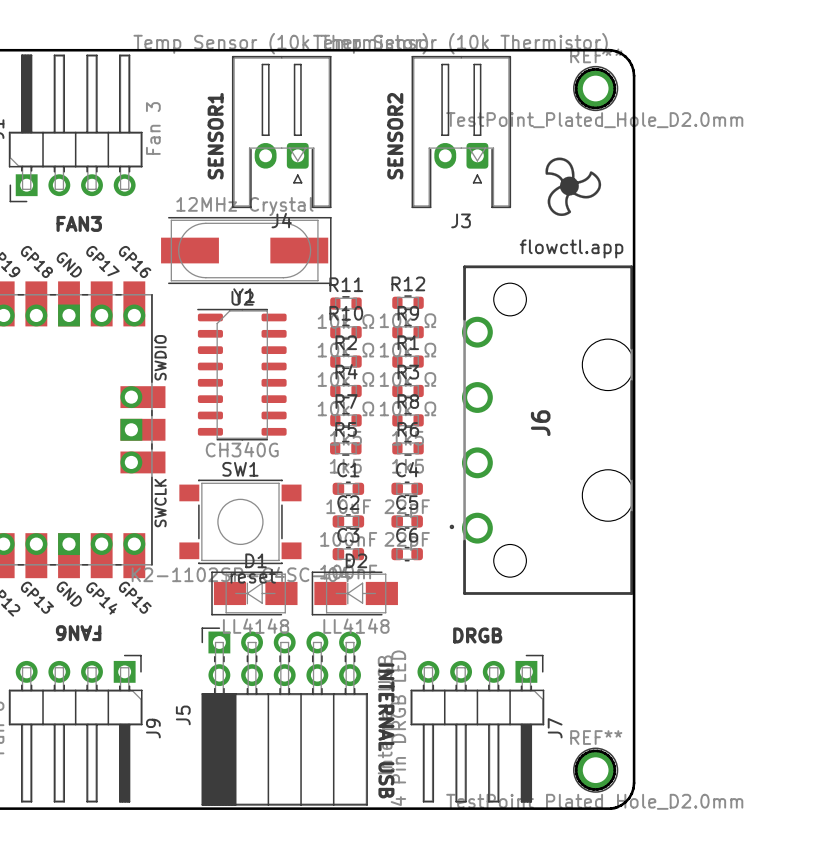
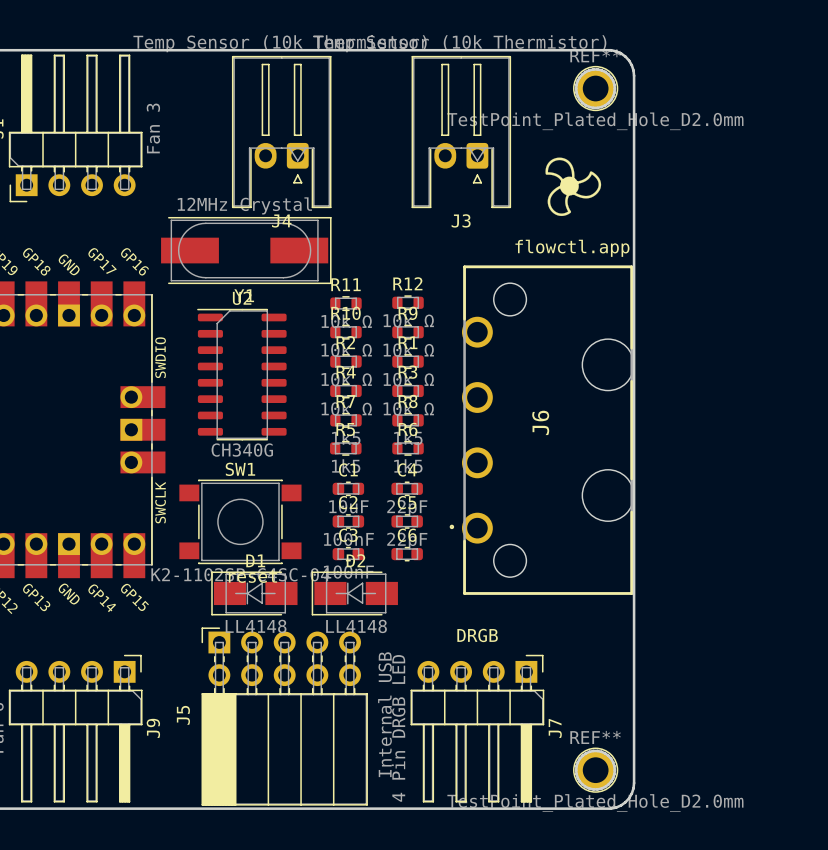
text: SENSOR1 (215, 136) -> none
text: SENSOR2 (395, 136) -> none
text: FAN3 (79, 223) -> none
text: FAN6 (78, 633) -> none
text: INTERNAL USB (386, 730) -> none

